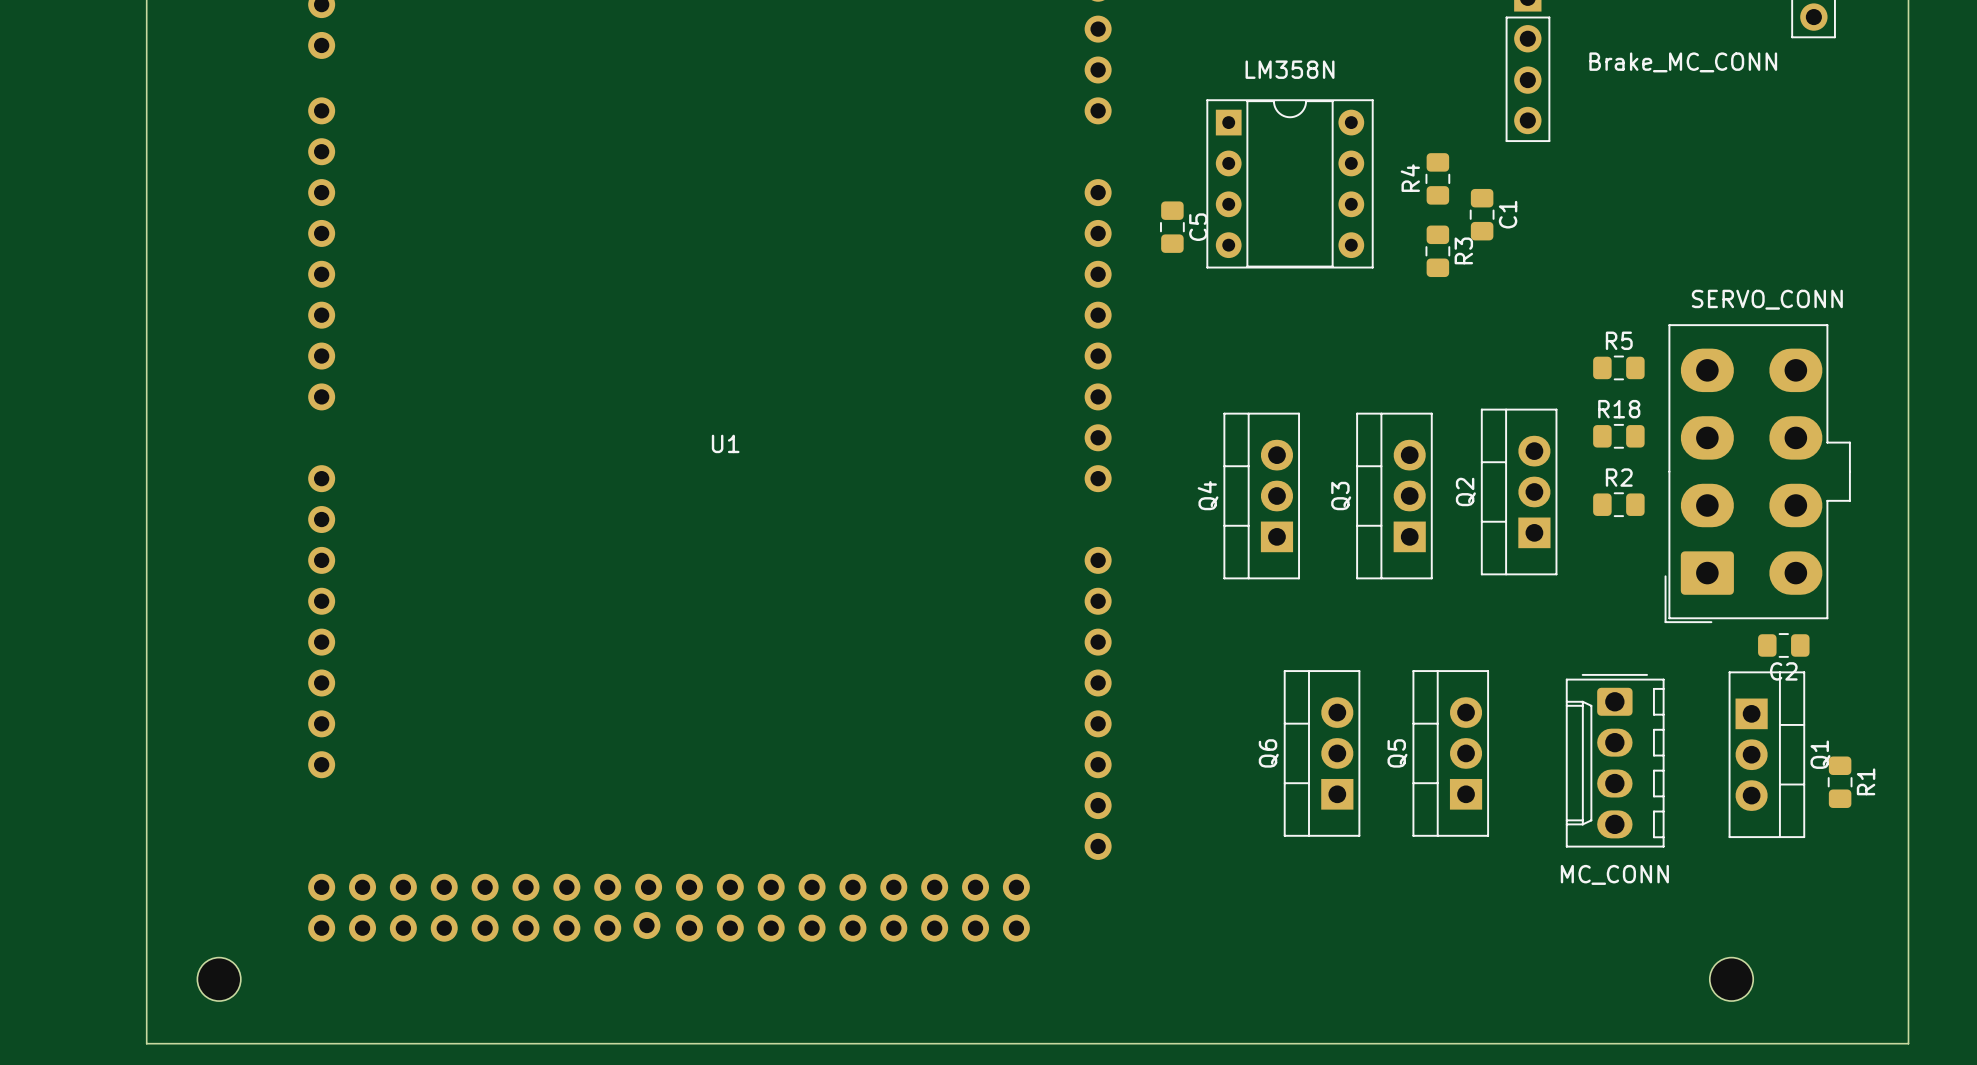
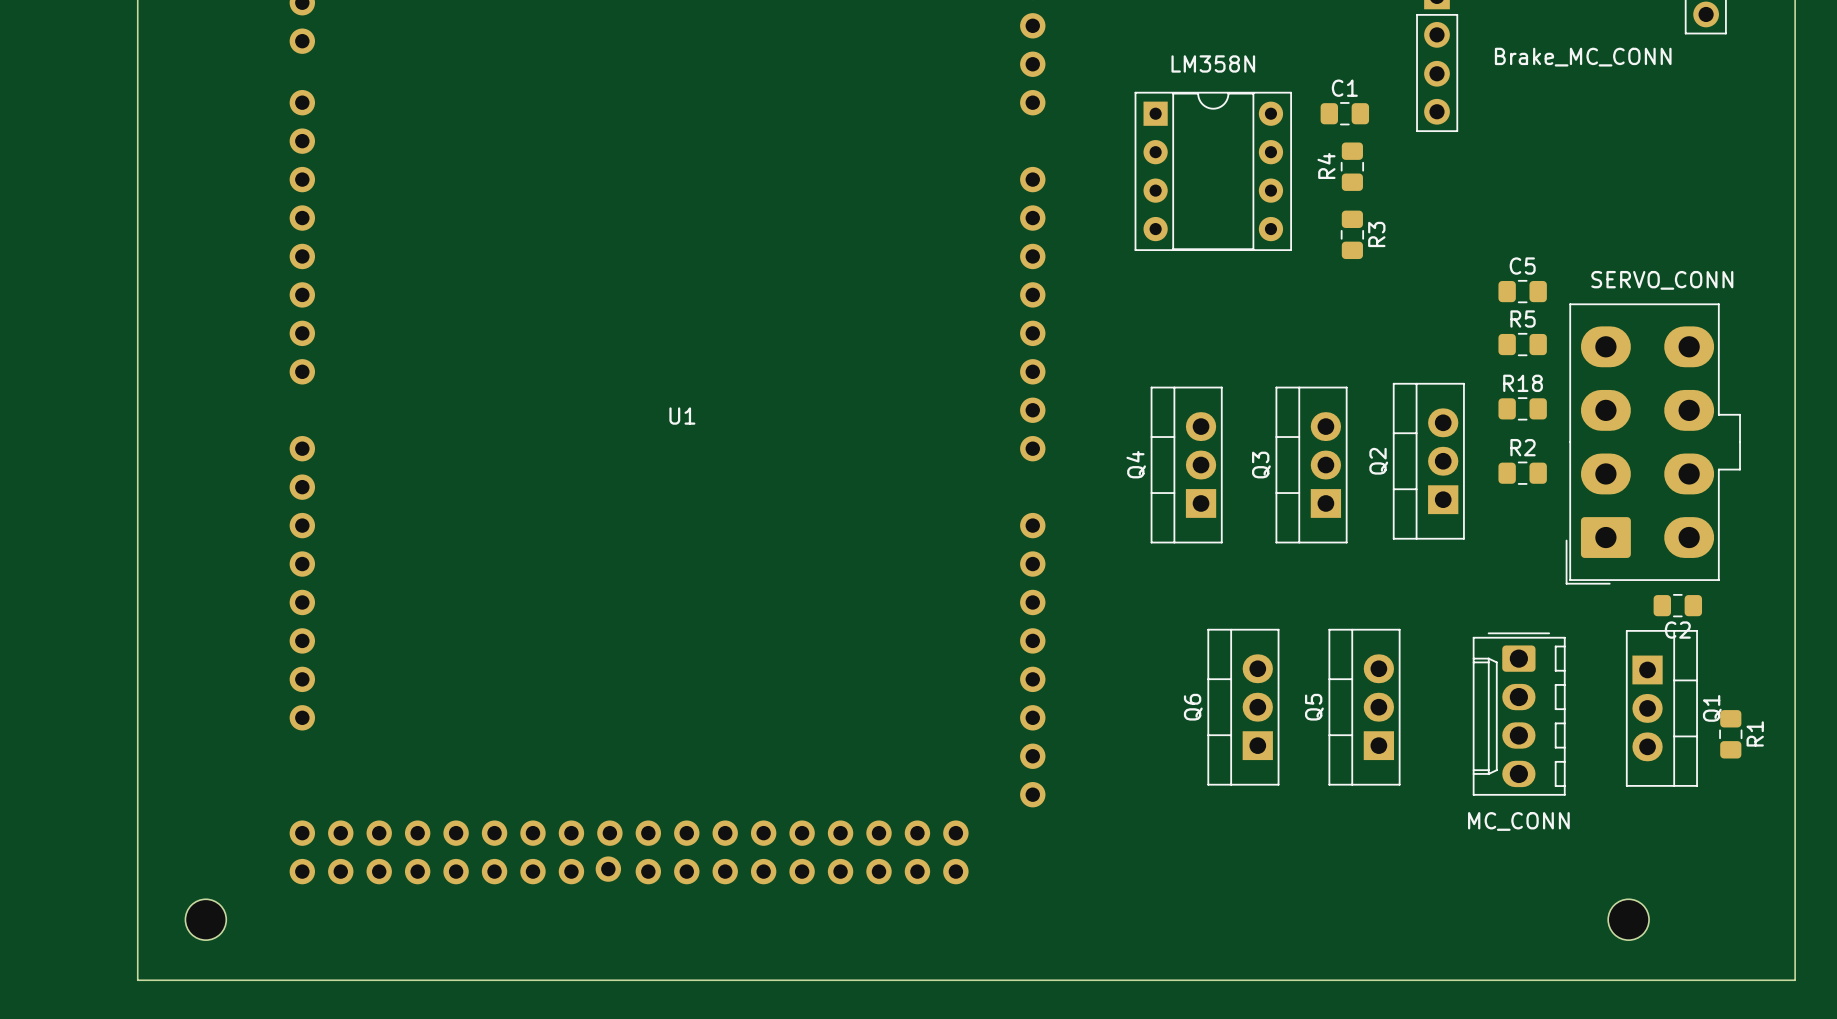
C1 rotation: 0° (1482, 214) -> 90° clockwise (1344, 113)
C1 position: (1482, 214) -> (1344, 113)
C1 name position: C1 (1508, 214) -> C1 (1344, 88)
C5 rotation: 0° (1172, 227) -> 90° clockwise (1522, 291)
C5 position: (1172, 227) -> (1522, 291)
C5 name position: C5 (1198, 227) -> C5 (1522, 266)

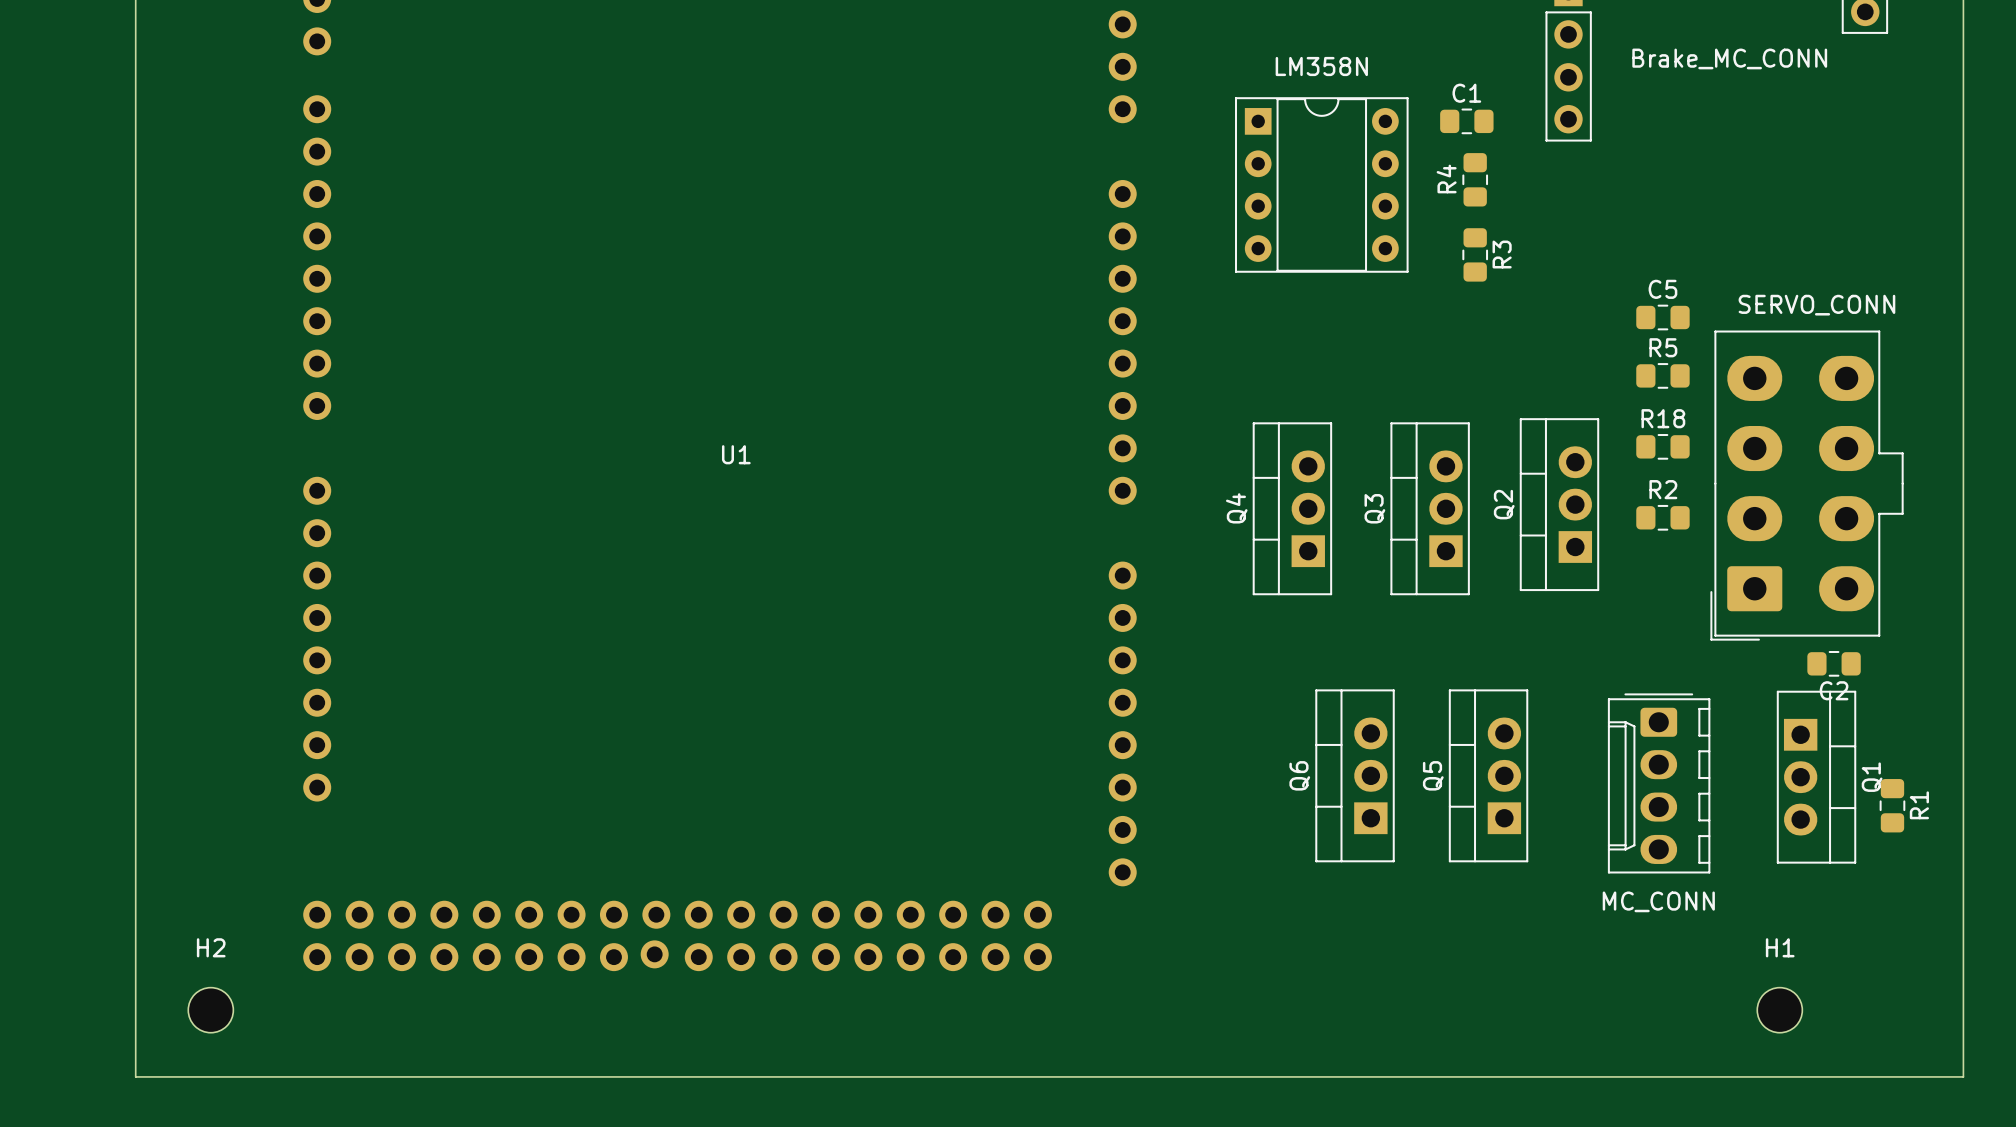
H2 name: none -> H2 (211, 947)
H1 name: none -> H1 (1780, 947)

